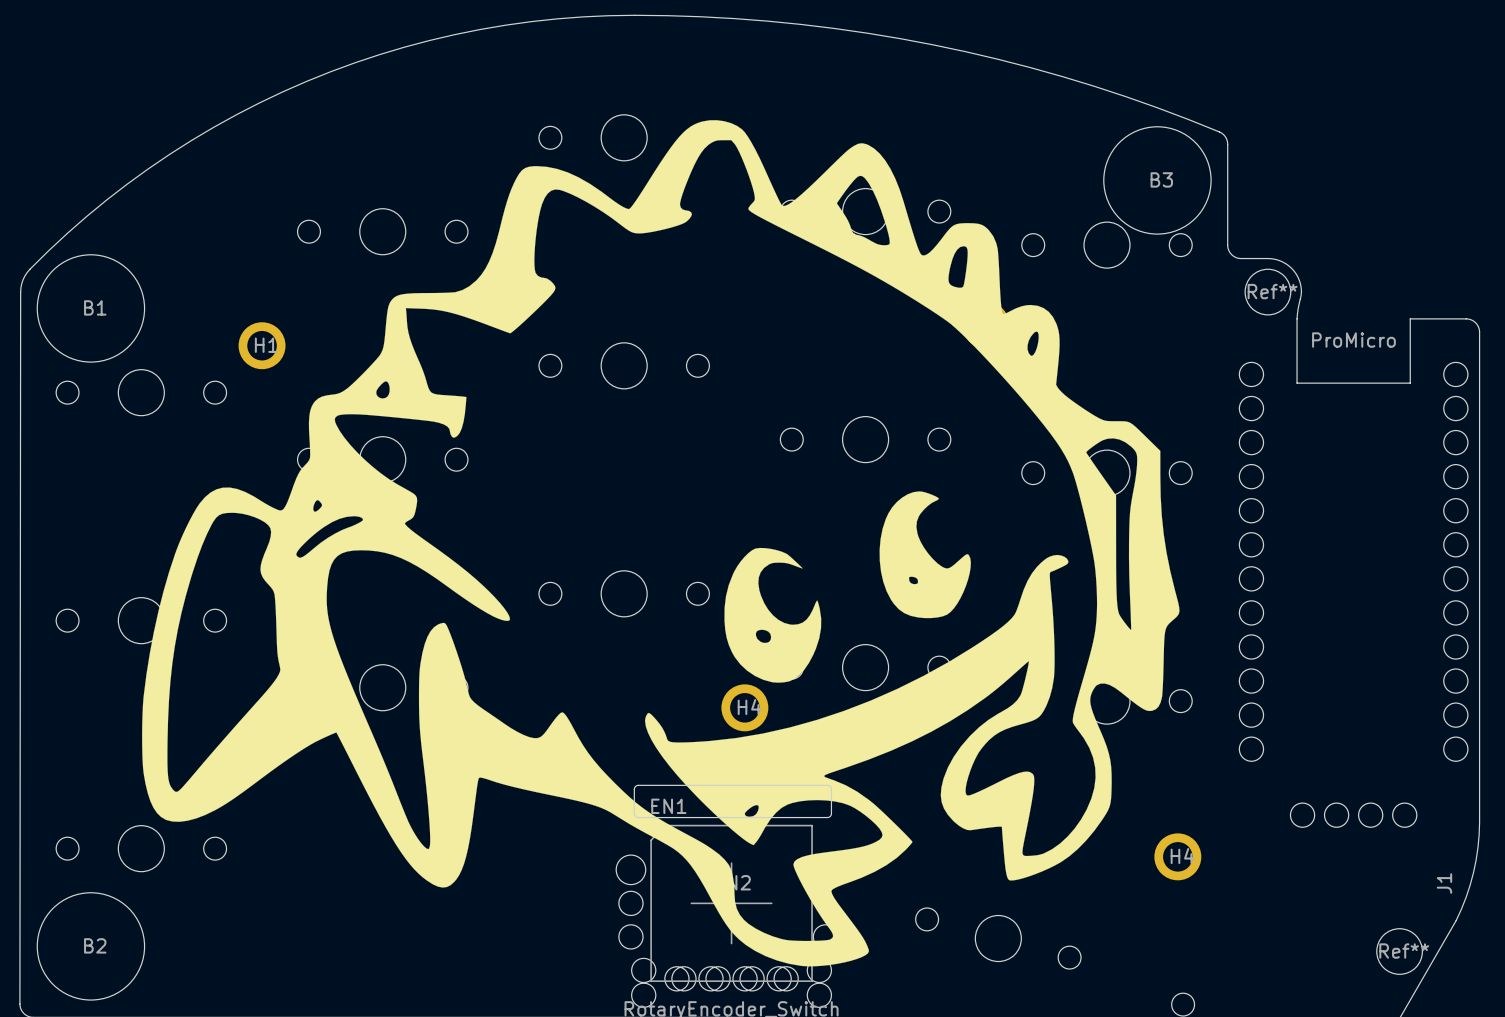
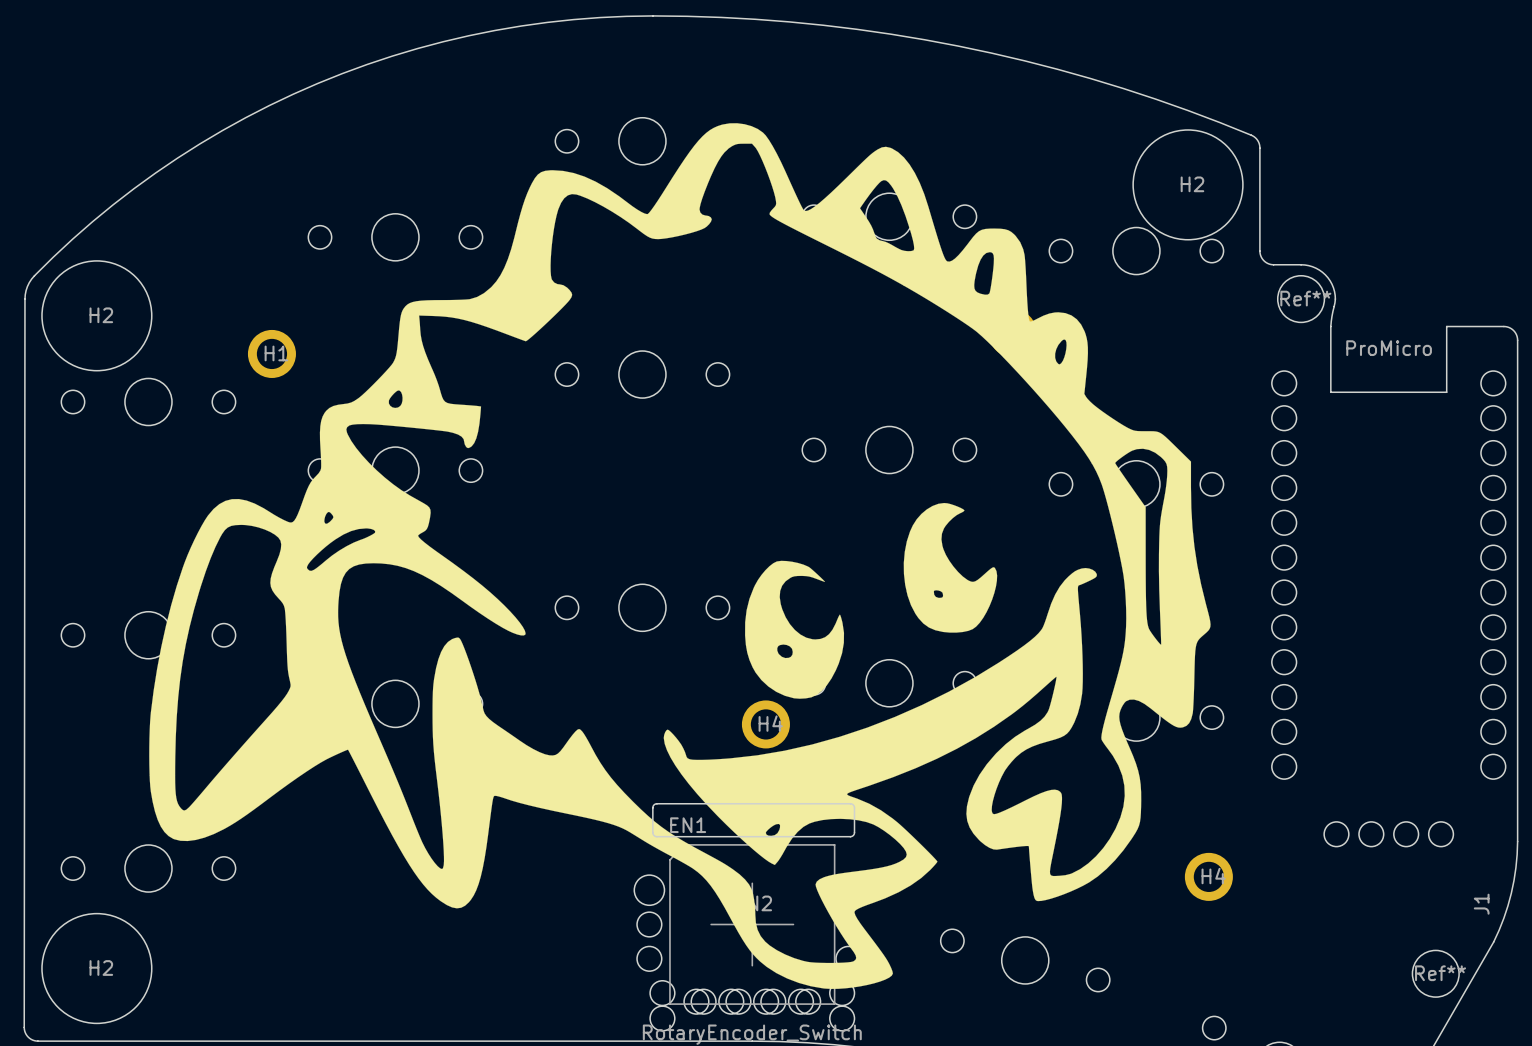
B3 name: B3 (1161, 179) -> H2 (1192, 184)
B1 name: B1 (95, 307) -> H2 (101, 315)
B2 name: B2 (95, 945) -> H2 (101, 968)

